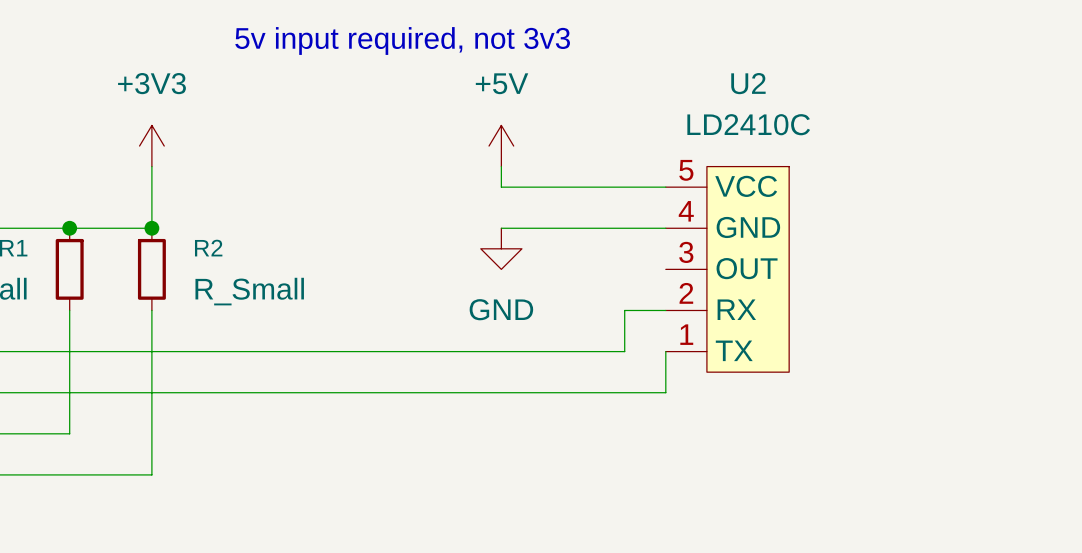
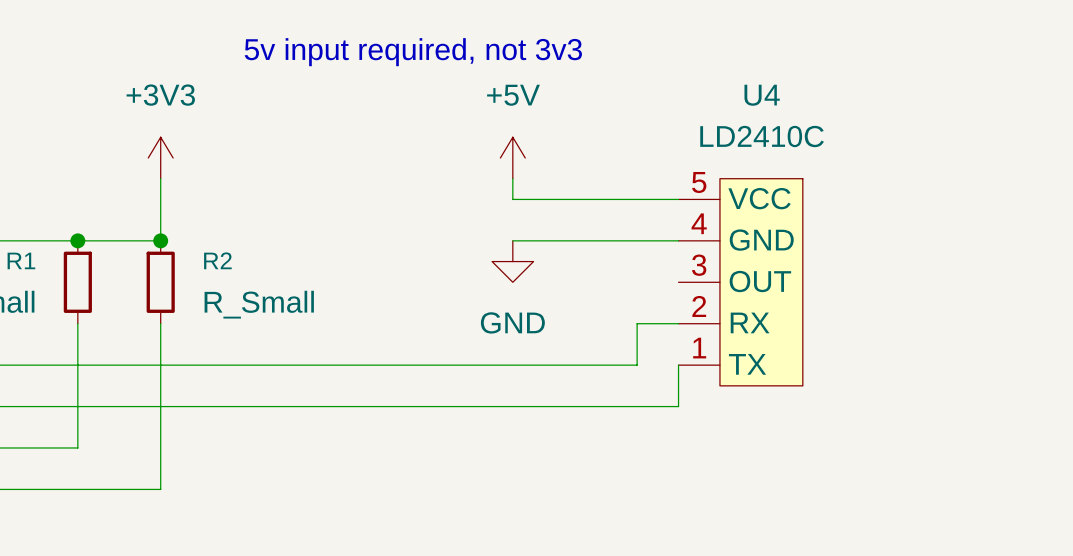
U2 name: U2 (748, 83) -> U4 (762, 95)

